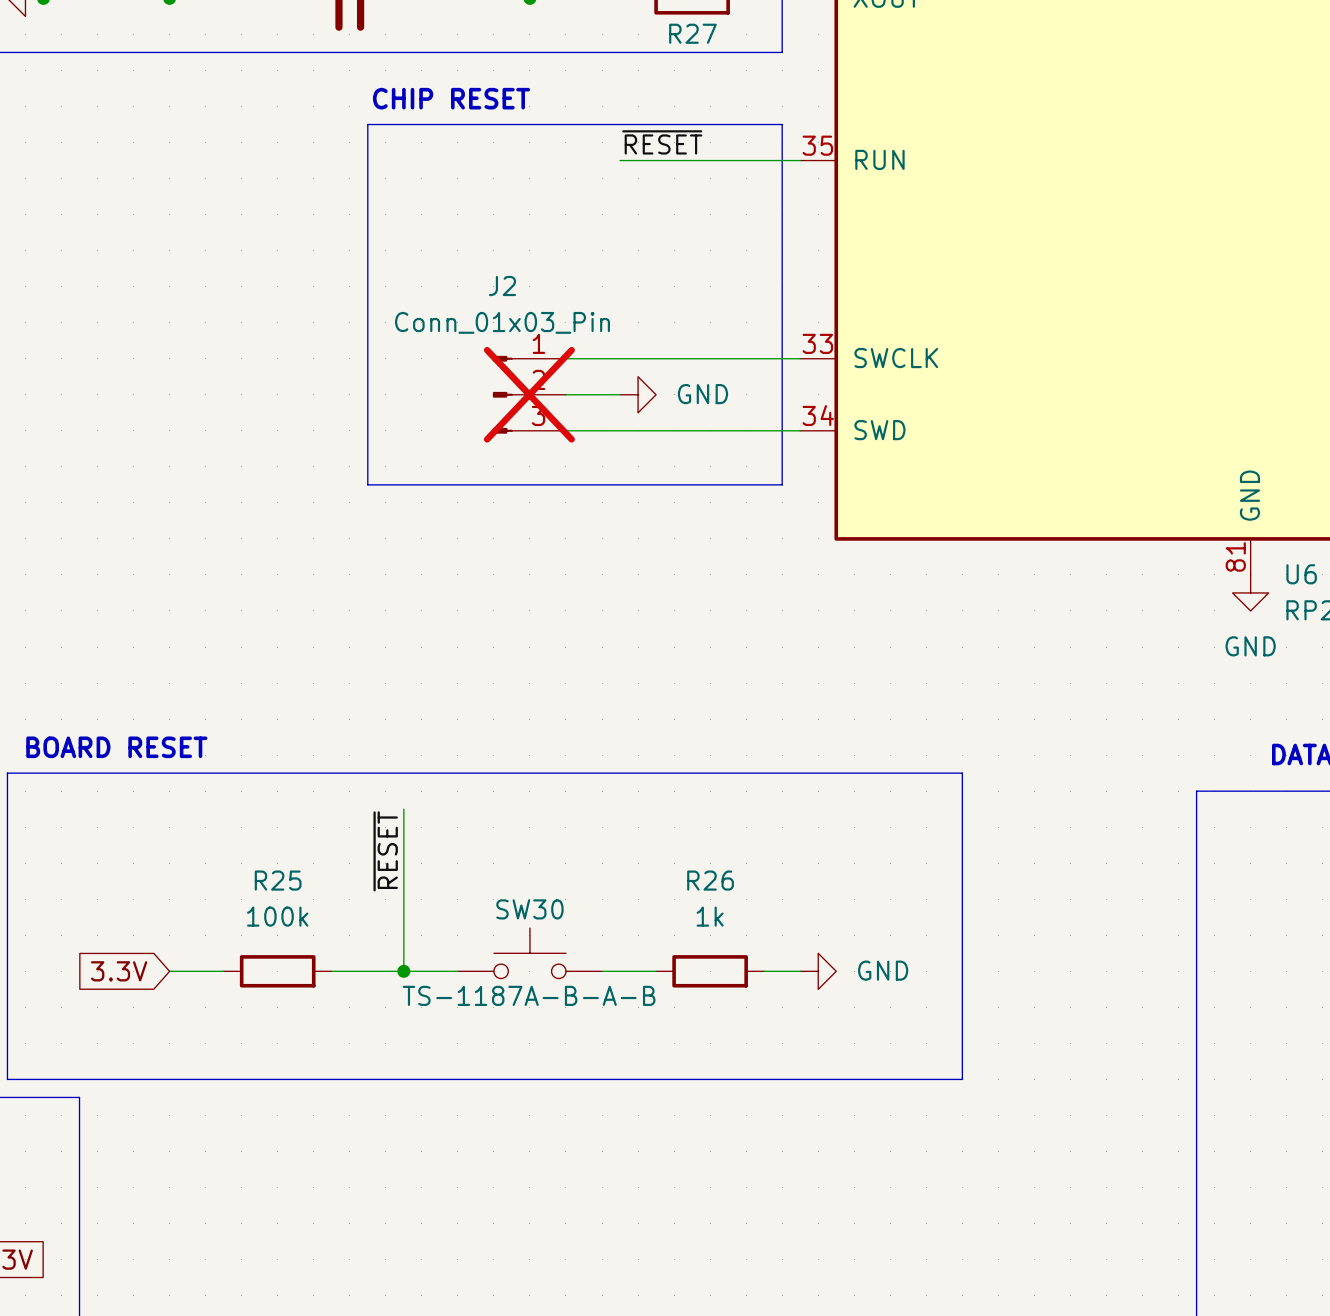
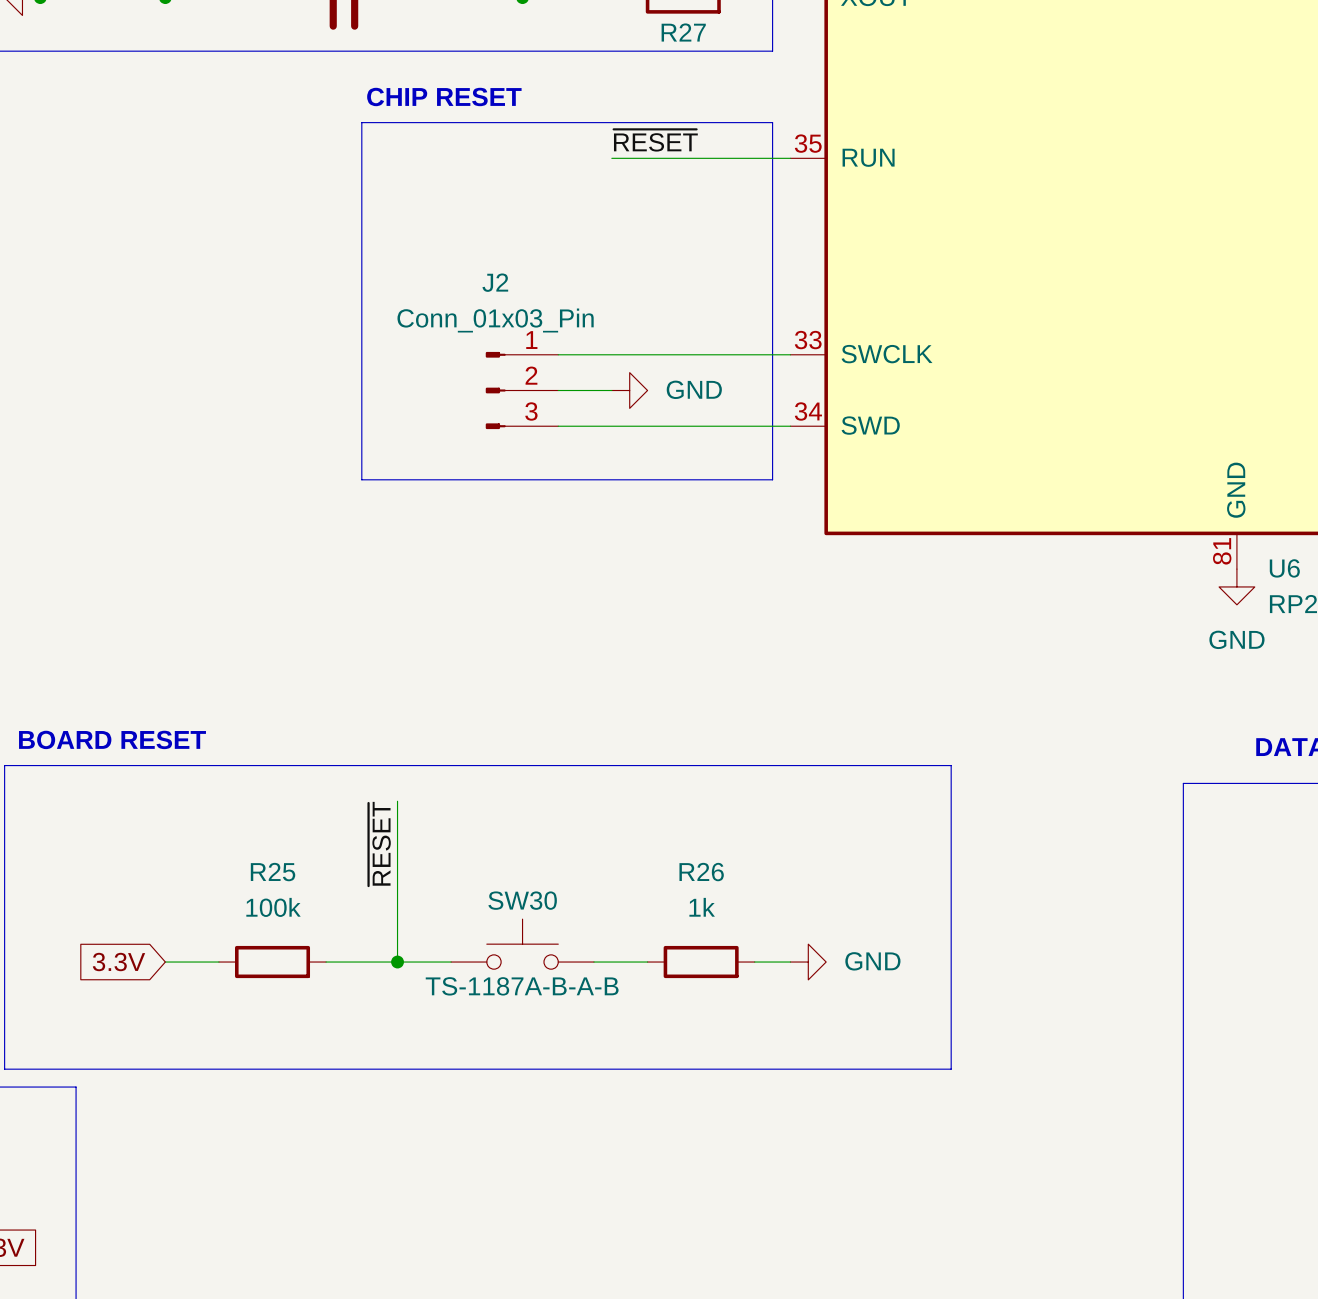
J2 do-not-place cross: (529, 394) -> none

